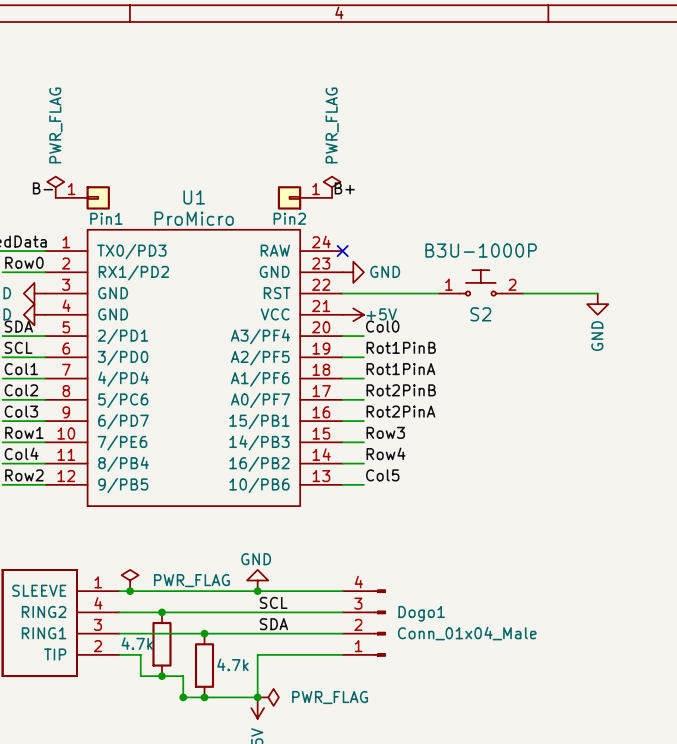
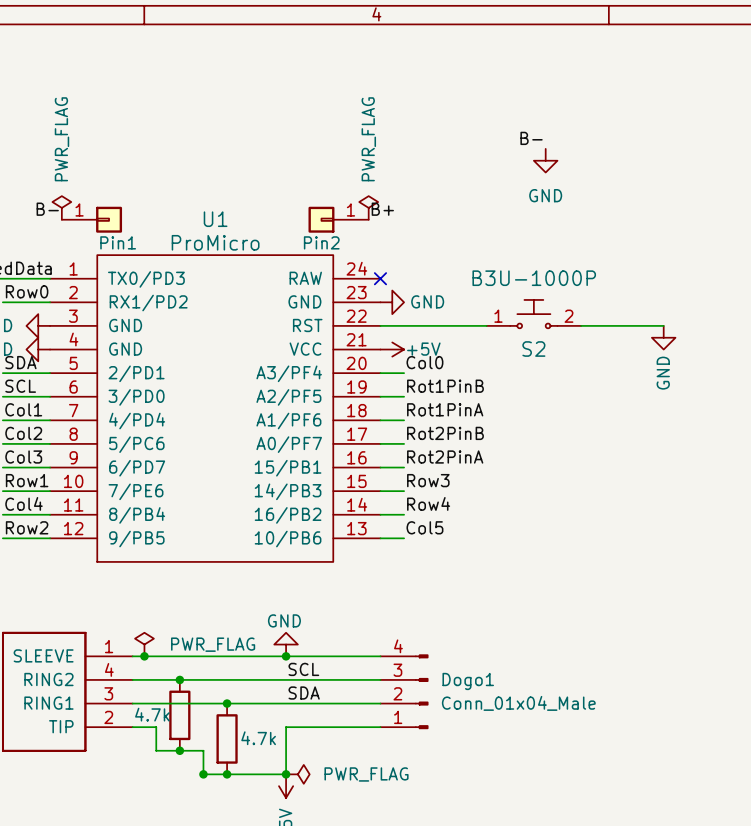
label: none -> B- (531, 138)
power symbol: none -> GND (545, 160)

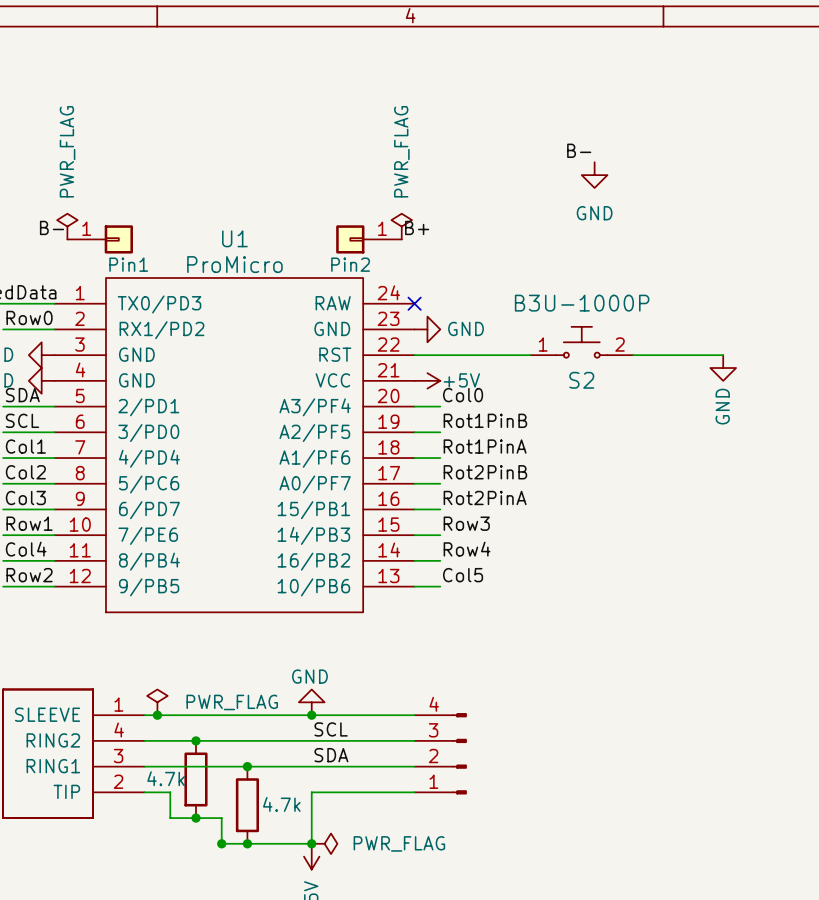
Dogo1 name: Dogo1 (468, 681) -> none
Dogo1 value: Conn_01x04_Male (518, 703) -> none

